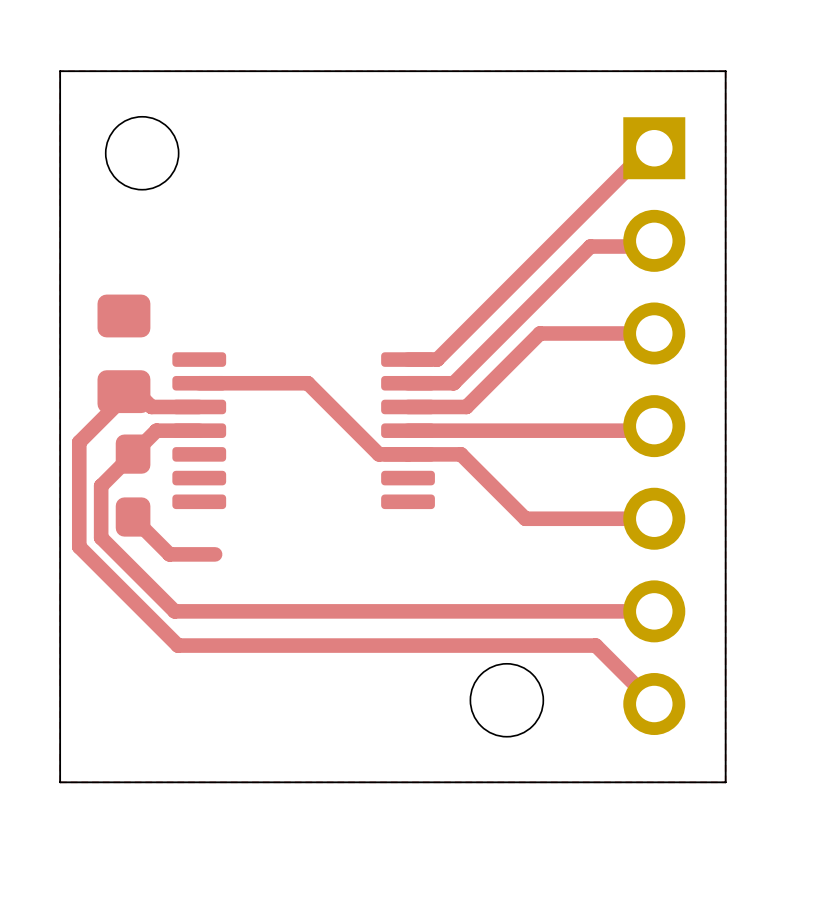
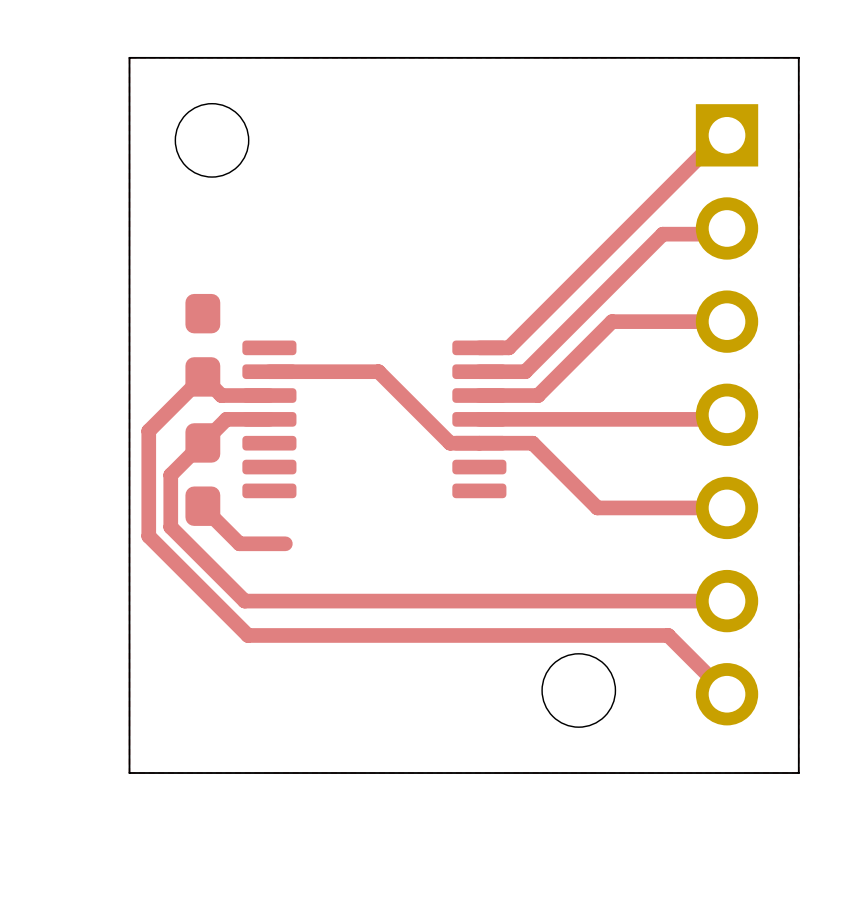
part footprint: [97, 294, 151, 414] -> [185, 293, 221, 397]

